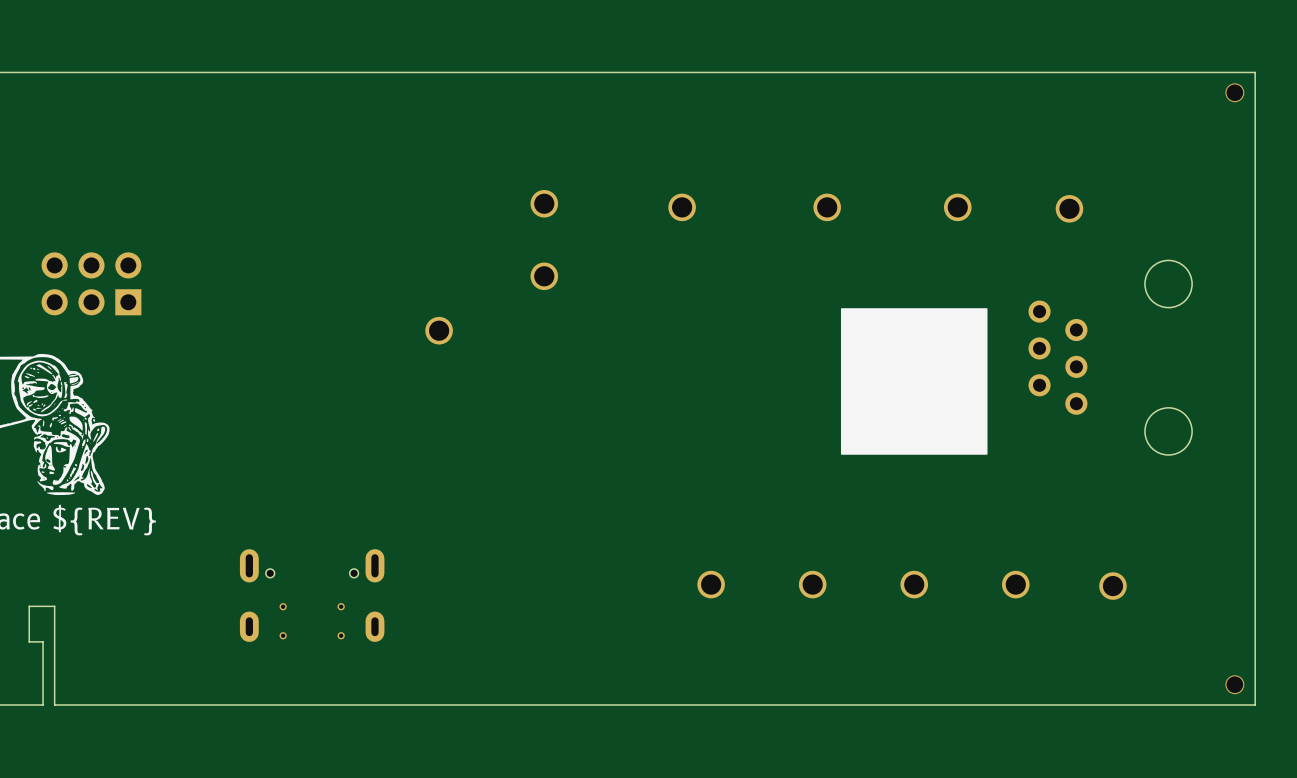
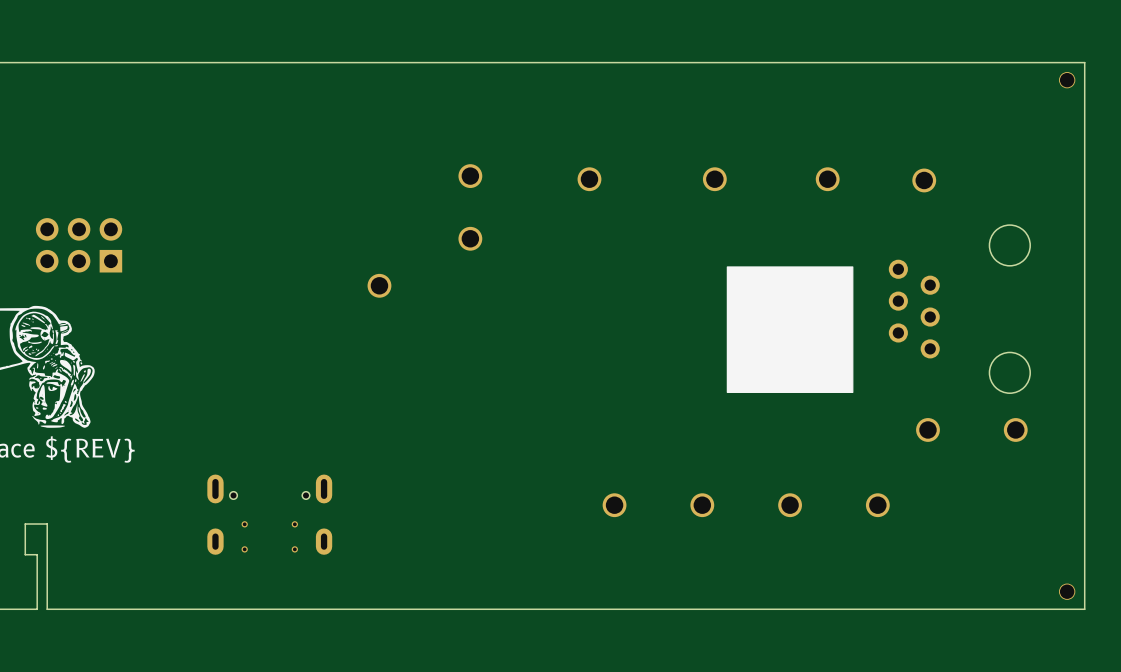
part: none -> (927, 429)
part: none -> (1015, 429)
part: (1113, 586) -> none

